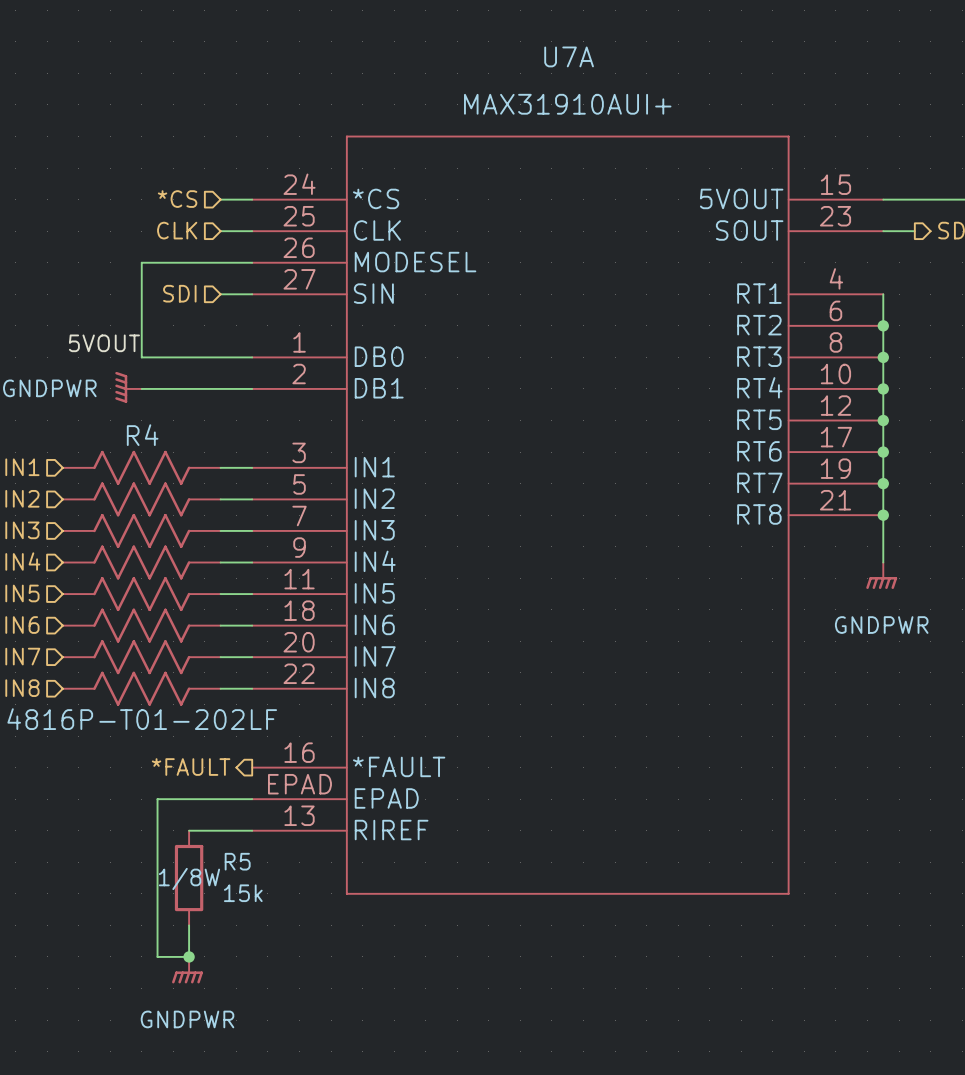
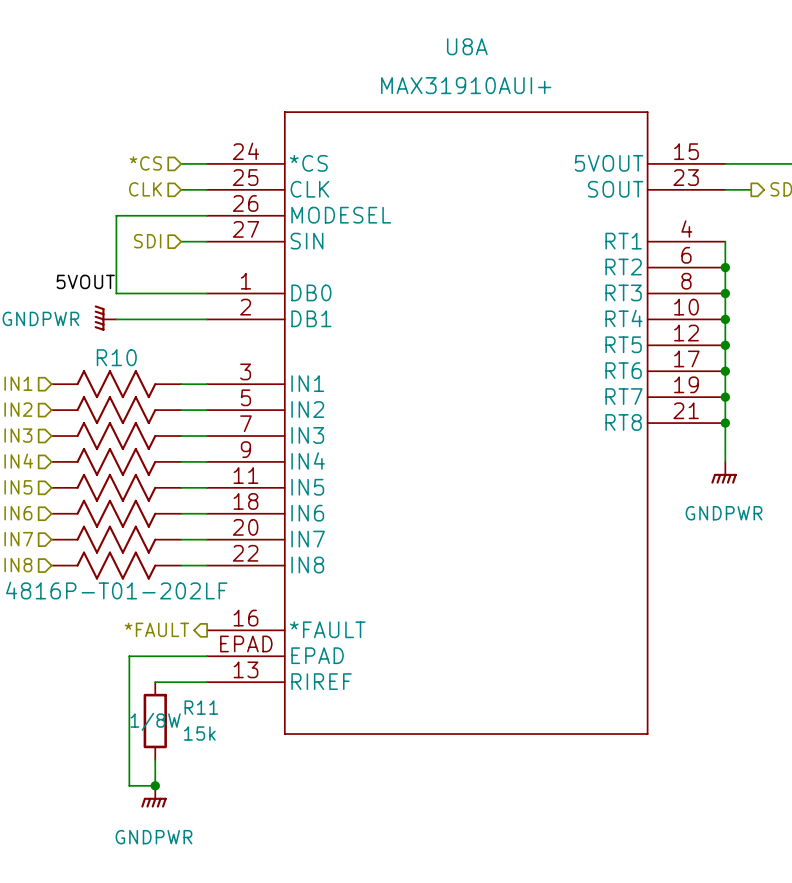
U7A name: U7A (569, 56) -> U8A (467, 46)
R4 name: R4 (142, 435) -> R10 (116, 357)
R5 name: R5 (237, 861) -> R11 (201, 707)

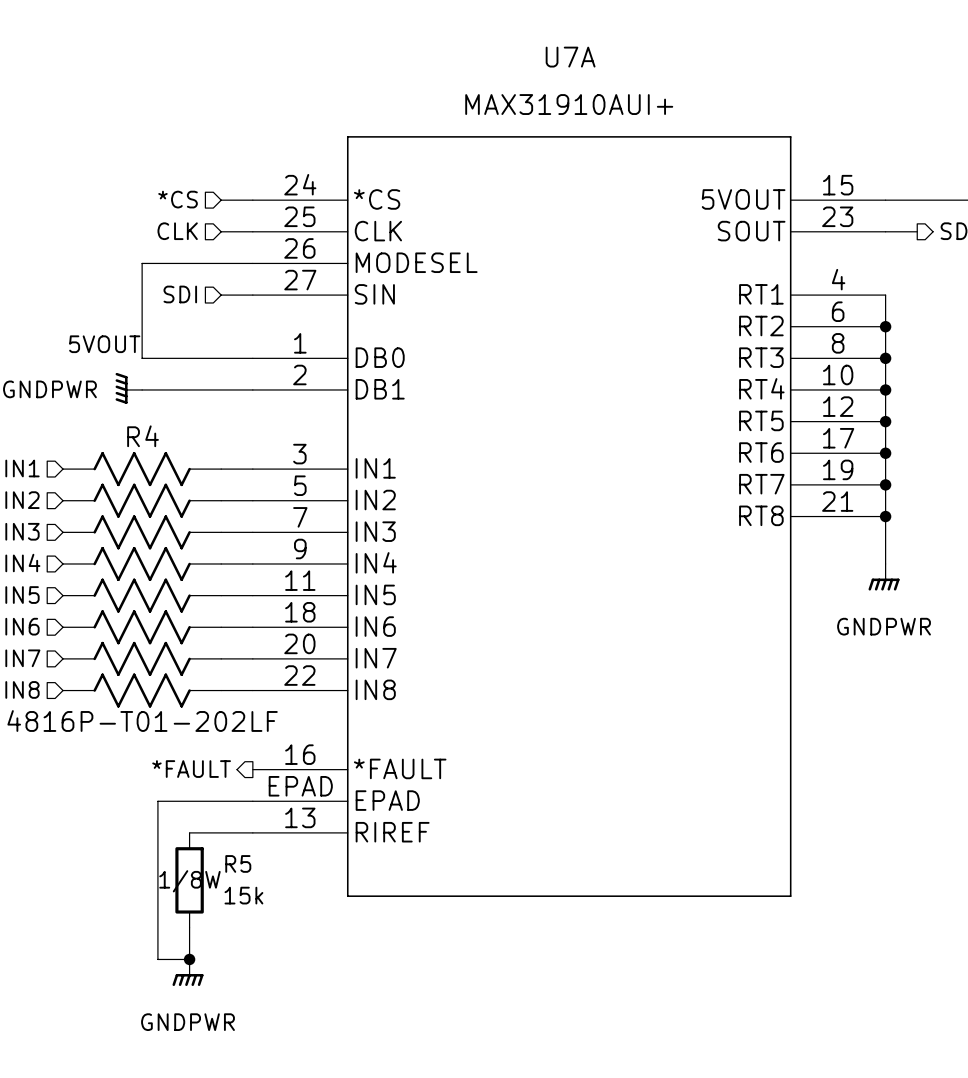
U8A name: U8A (467, 46) -> U7A (570, 57)
R10 name: R10 (116, 357) -> R4 (143, 436)
R11 name: R11 (201, 707) -> R5 (238, 863)

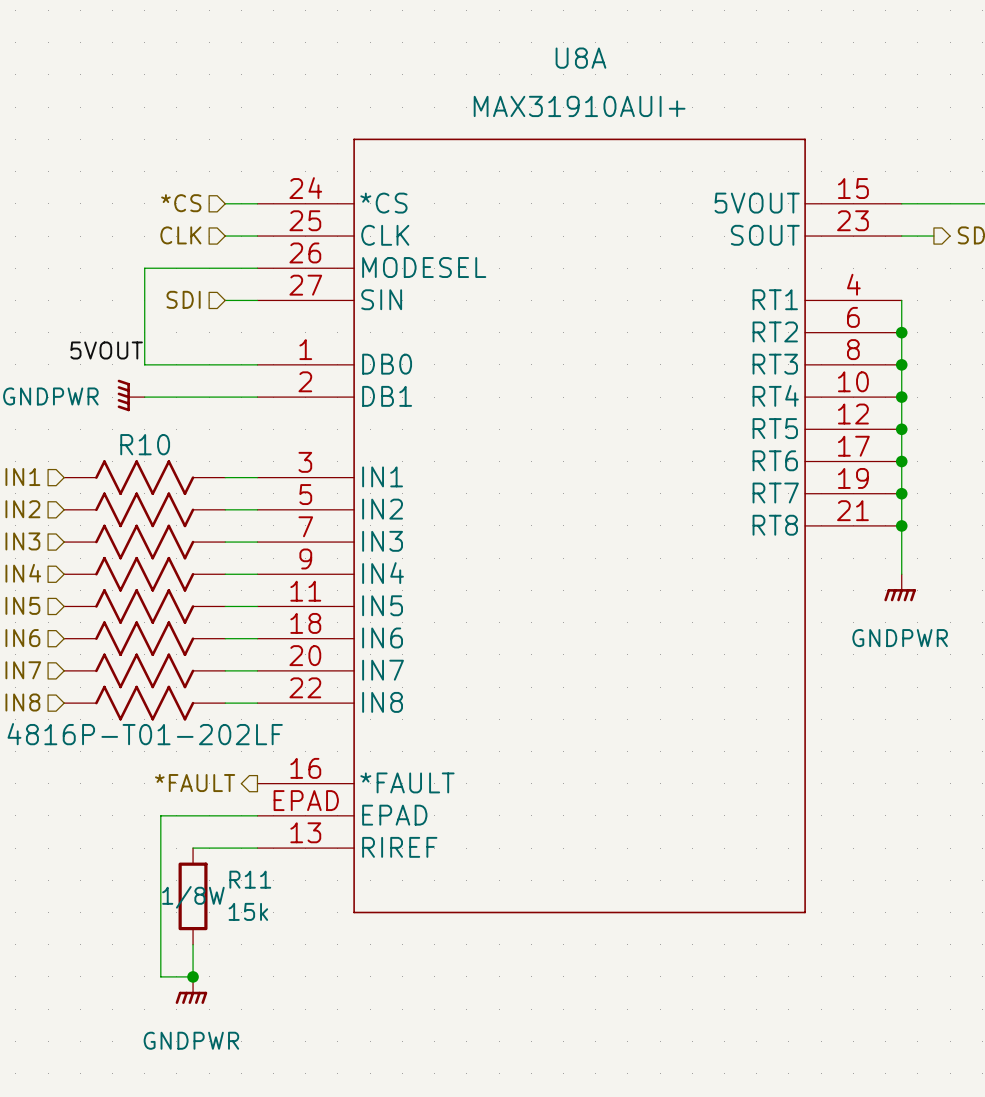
U7A name: U7A (570, 57) -> U8A (580, 58)
R4 name: R4 (143, 436) -> R10 (145, 444)
R5 name: R5 (238, 863) -> R11 (250, 879)

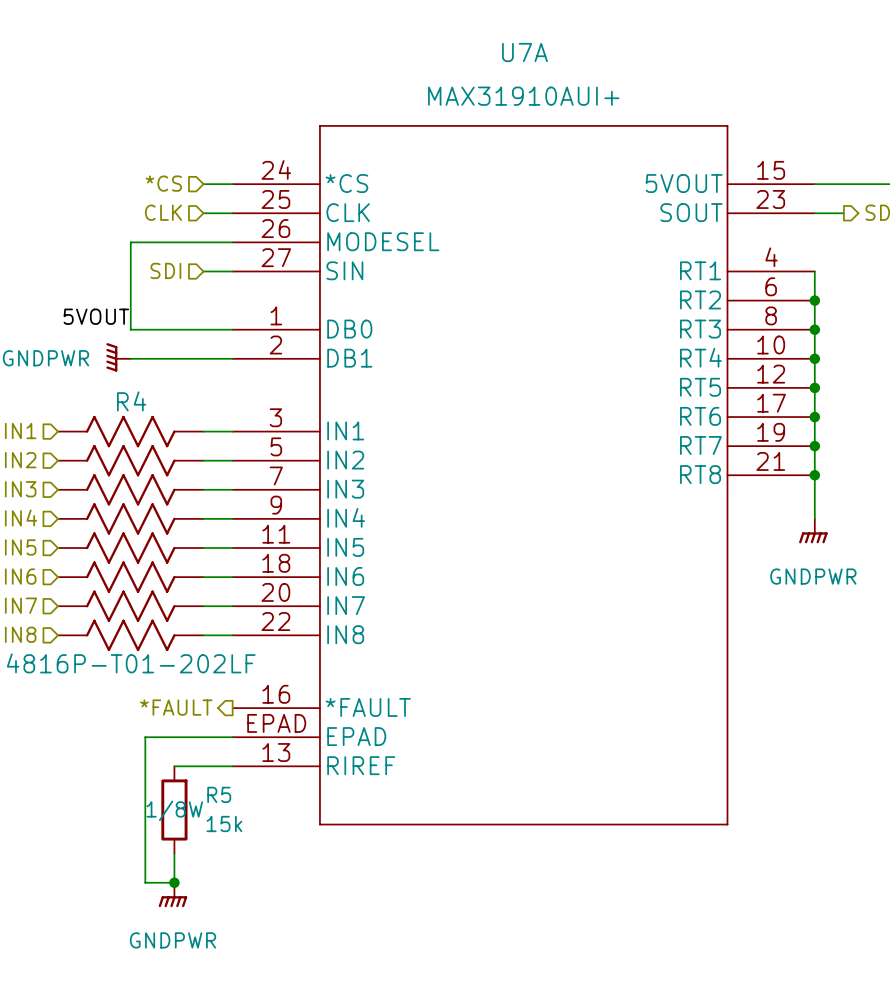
U8A name: U8A (580, 58) -> U7A (524, 52)
R10 name: R10 (145, 444) -> R4 (131, 401)
R11 name: R11 (250, 879) -> R5 (219, 794)

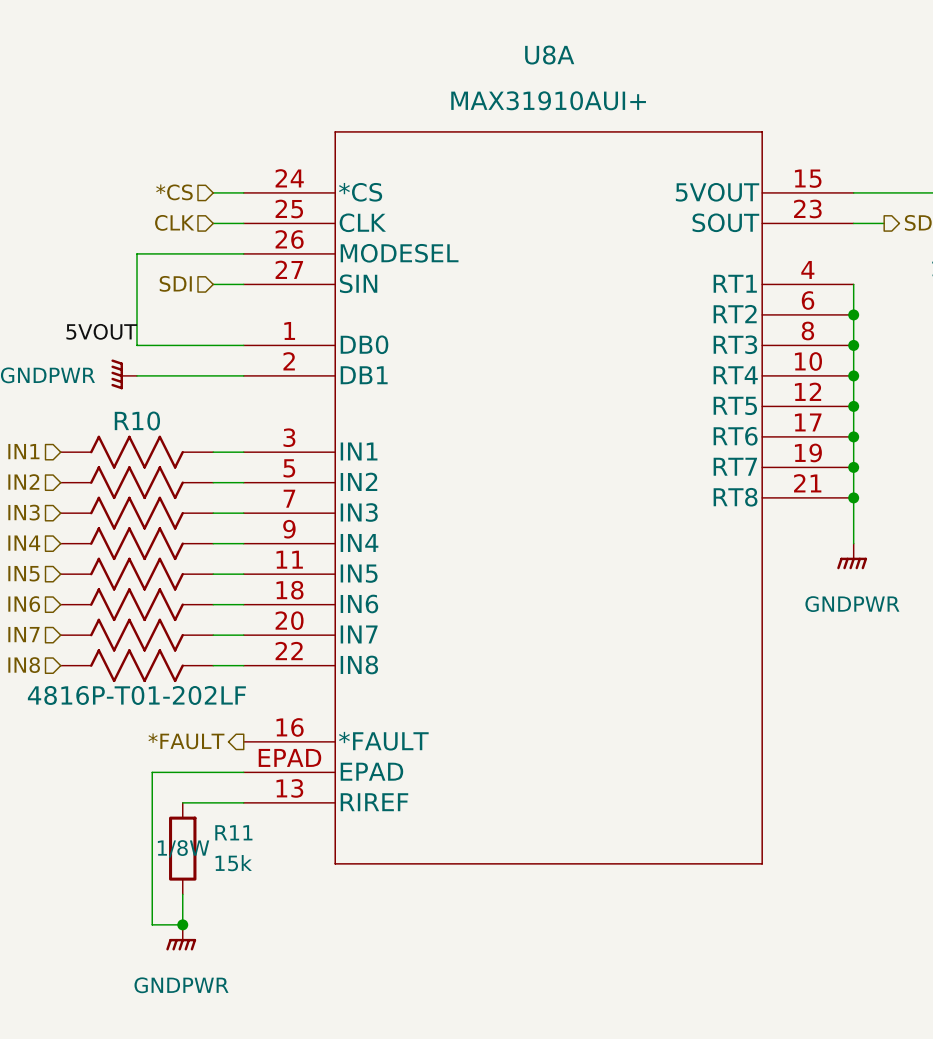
U7A name: U7A (524, 52) -> U8A (549, 55)
R4 name: R4 (131, 401) -> R10 (137, 421)
R5 name: R5 (219, 794) -> R11 (233, 832)

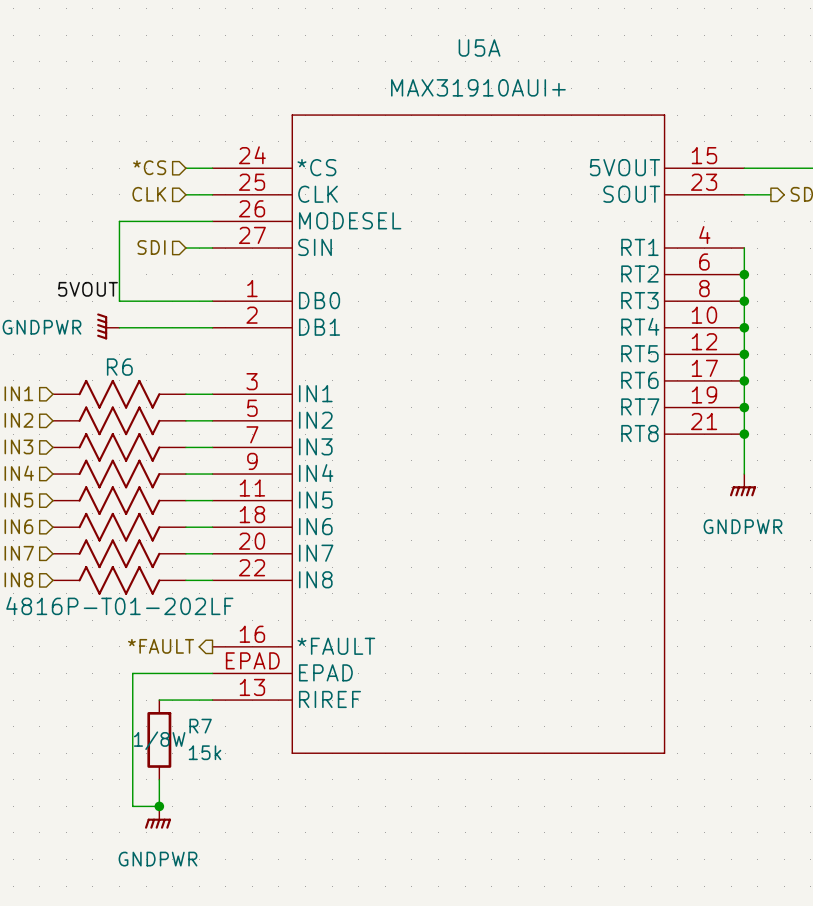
U8A name: U8A (549, 55) -> U5A (479, 47)
R10 name: R10 (137, 421) -> R6 (119, 367)
R11 name: R11 (233, 832) -> R7 (200, 726)

